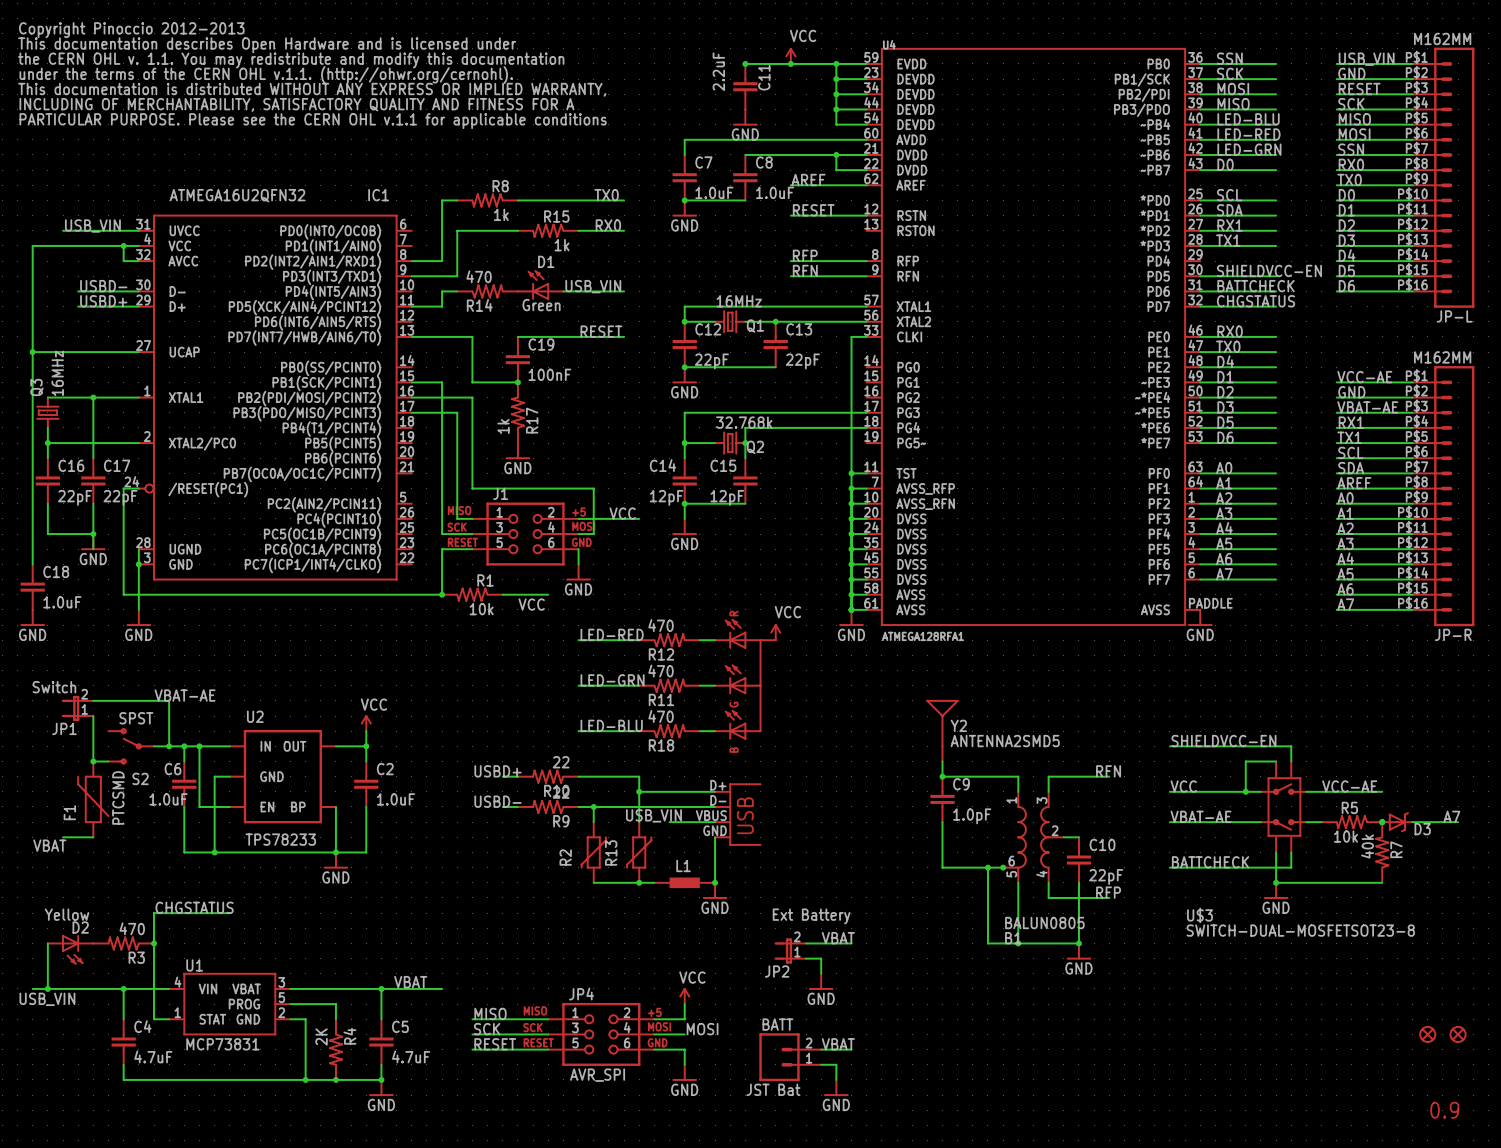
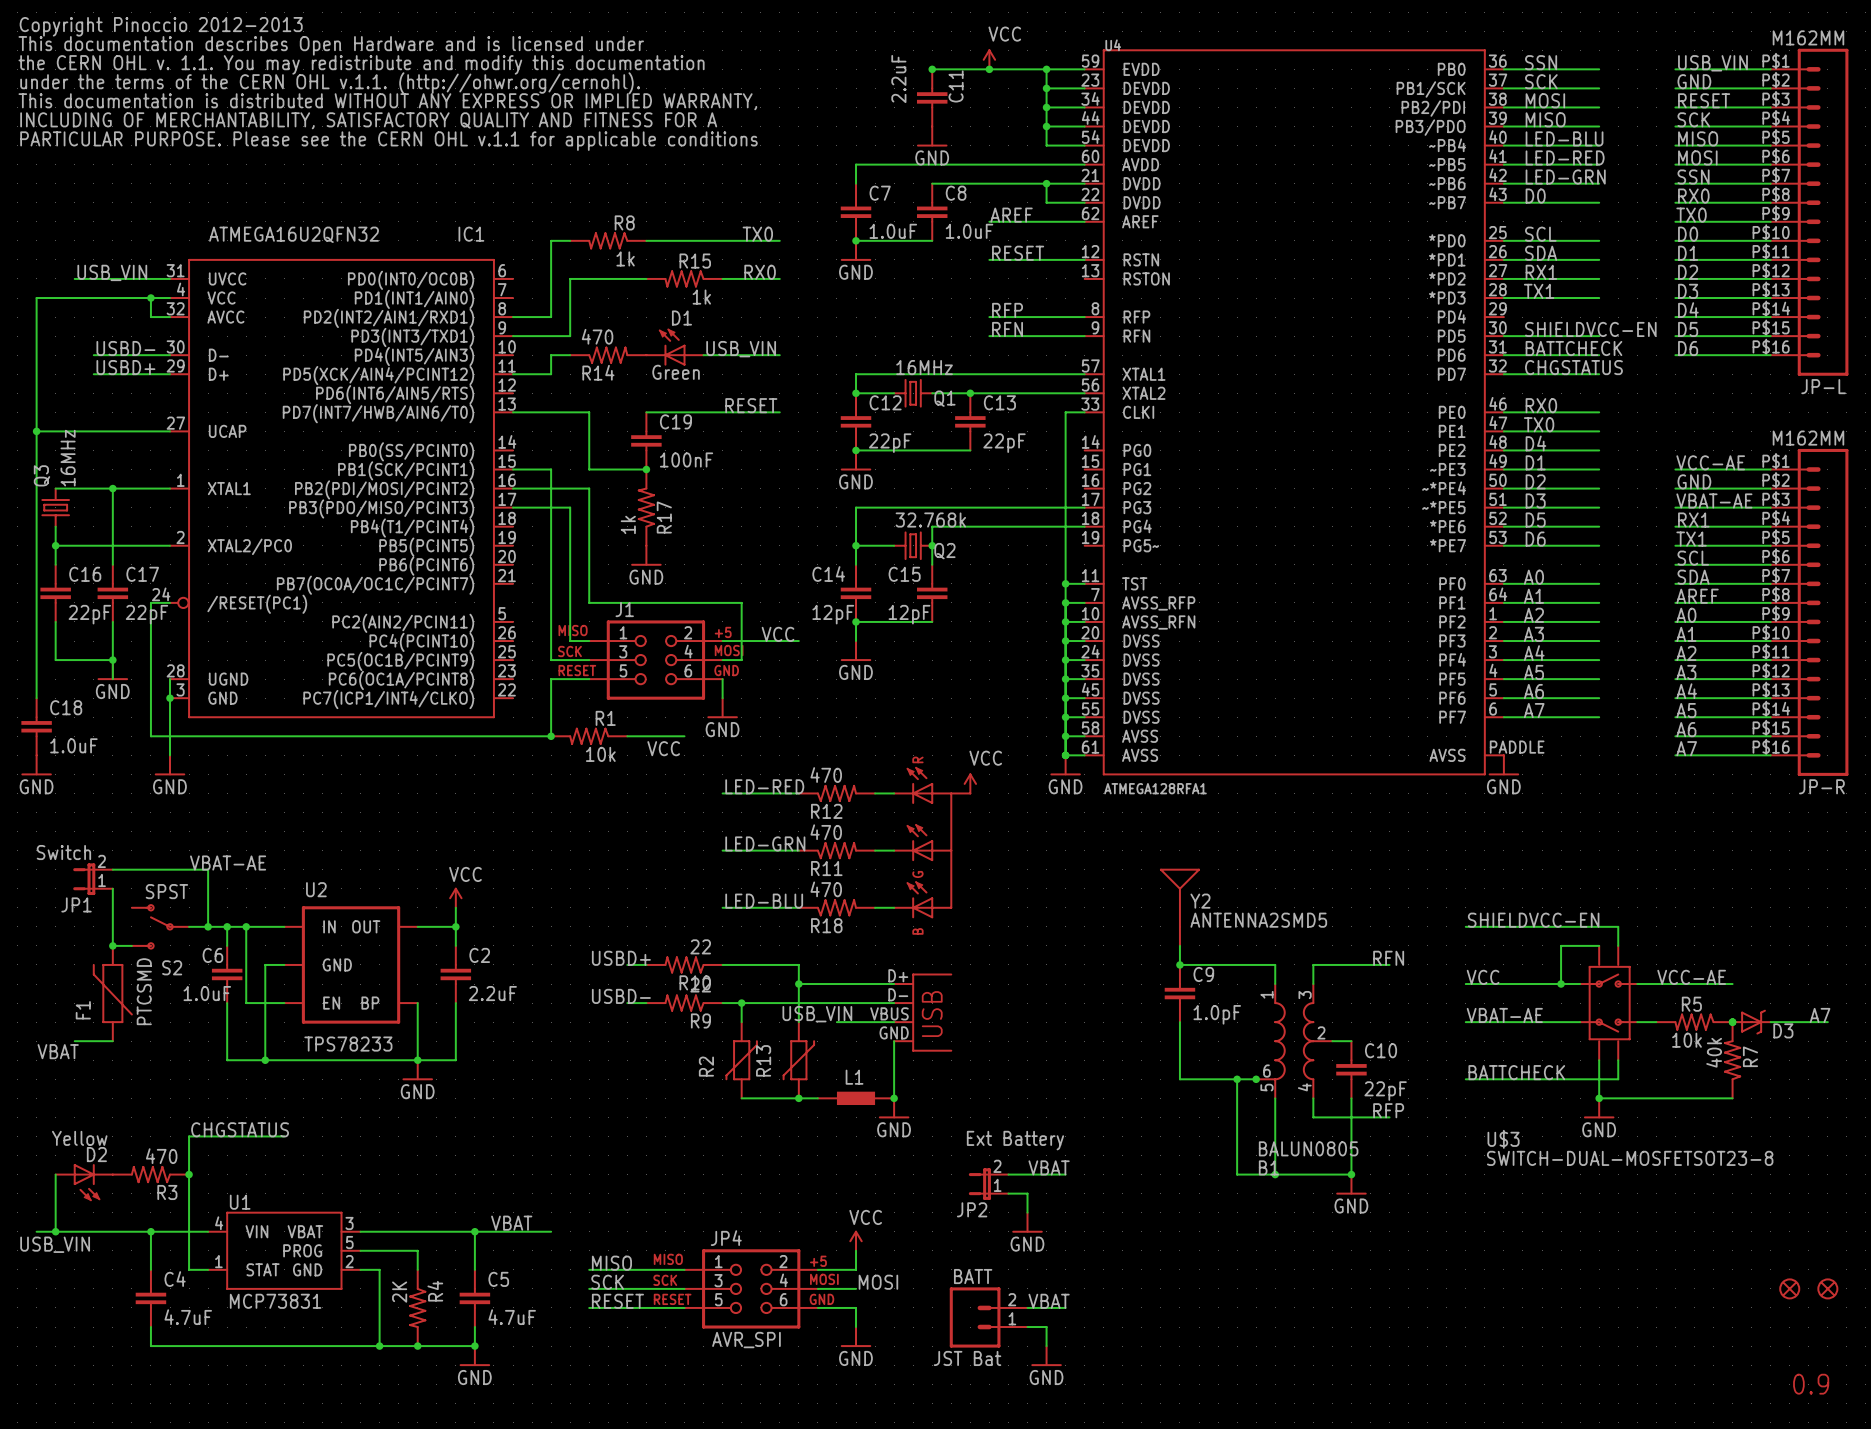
C2 value: 1.0uF (395, 799) -> 2.2uF (492, 993)

